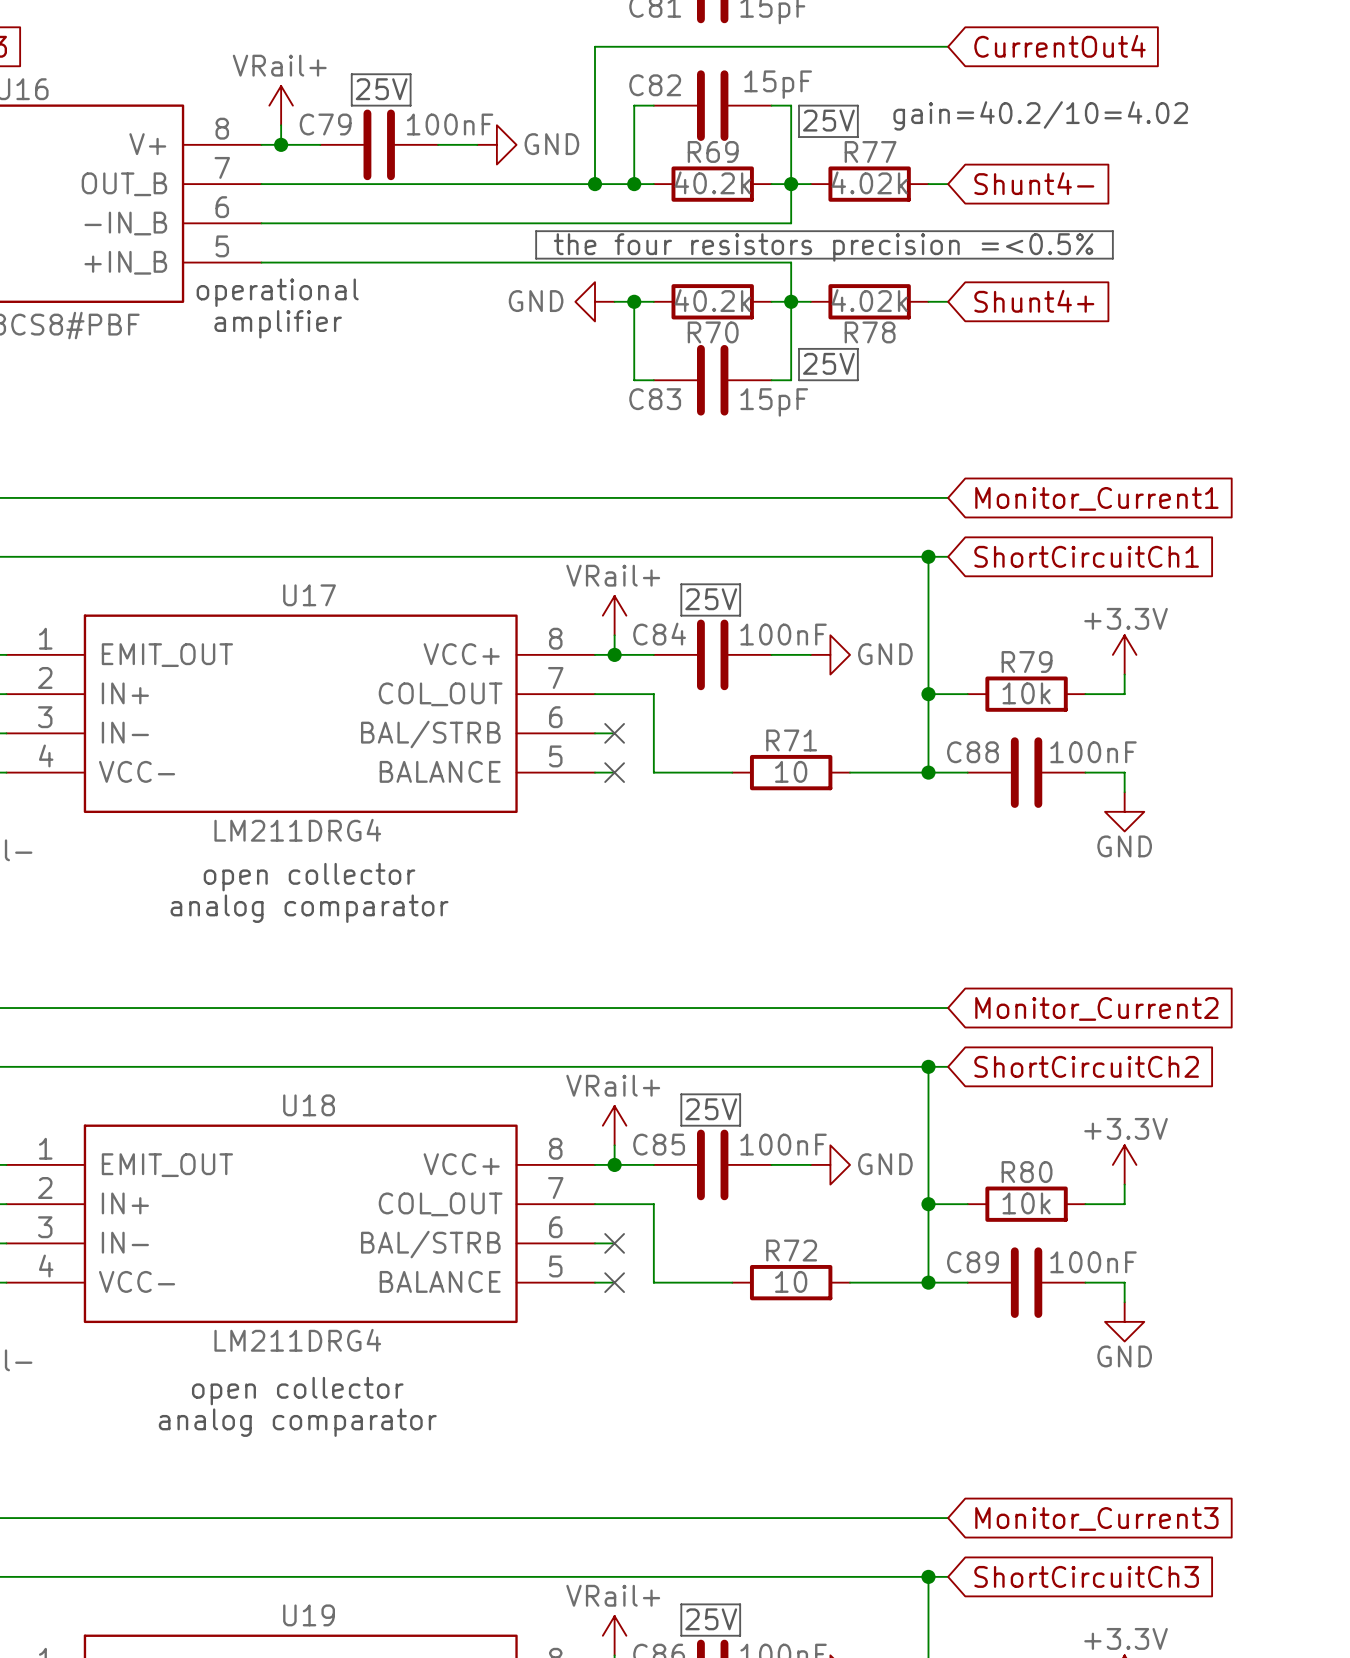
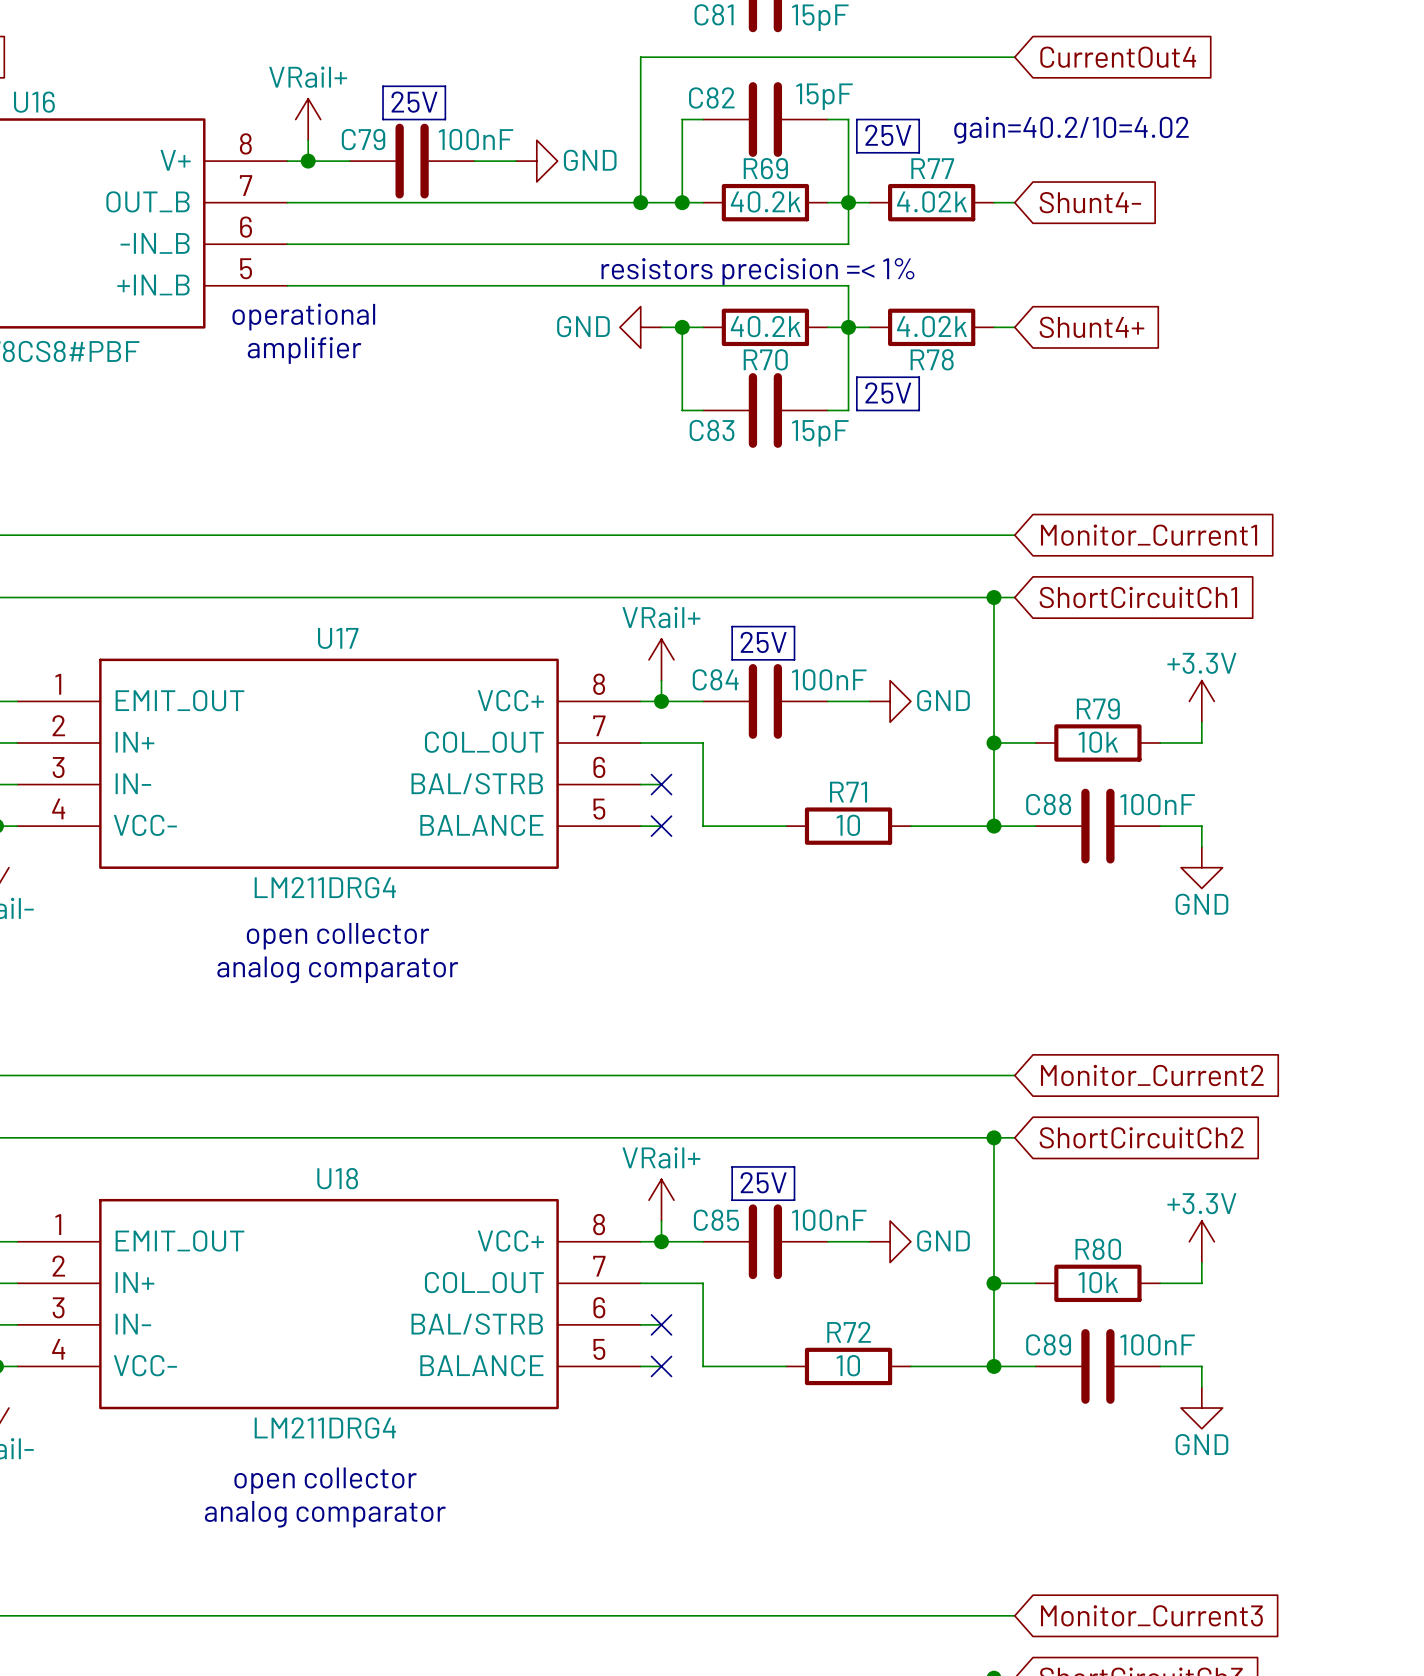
line: (536, 231) (1112, 231) (1112, 258) (536, 258) (536, 231) -> none
text: the four resistors precision =<0.5% (823, 247) -> resistors precision =< 1% (757, 271)

